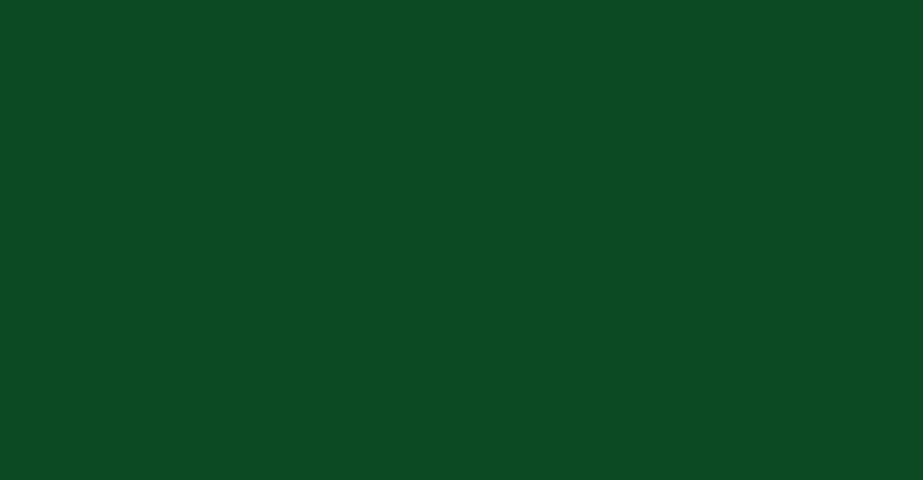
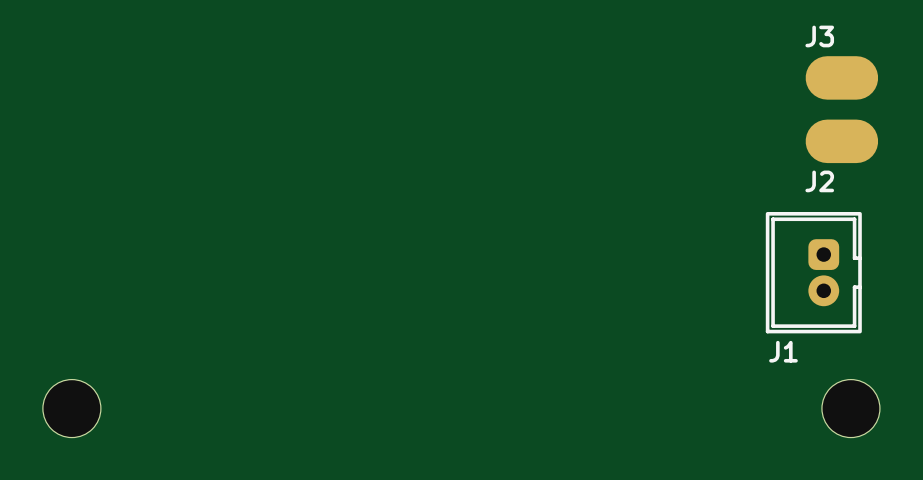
J3: none -> (841, 77)
J2: none -> (841, 141)
J1: none -> (813, 272)
part: none -> (71, 408)
part: none -> (850, 408)

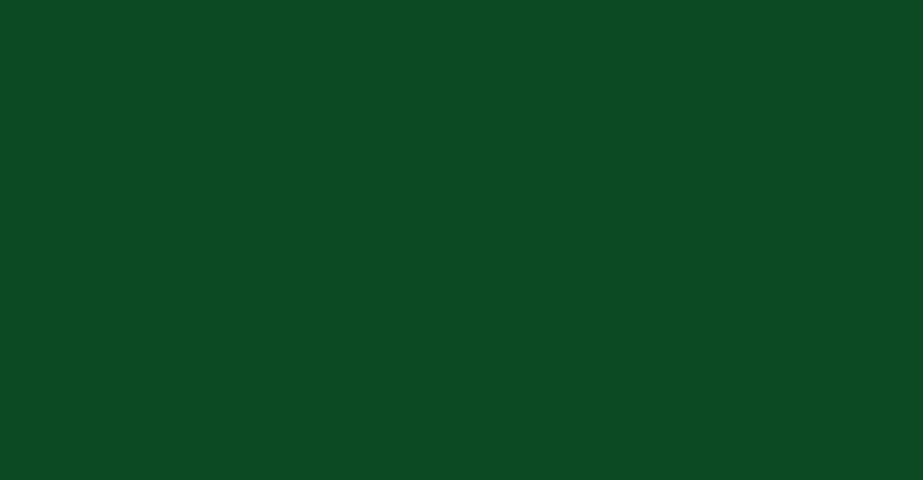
J3: (841, 77) -> none
J2: (841, 141) -> none
J1: (813, 272) -> none
part: (71, 408) -> none
part: (850, 408) -> none

